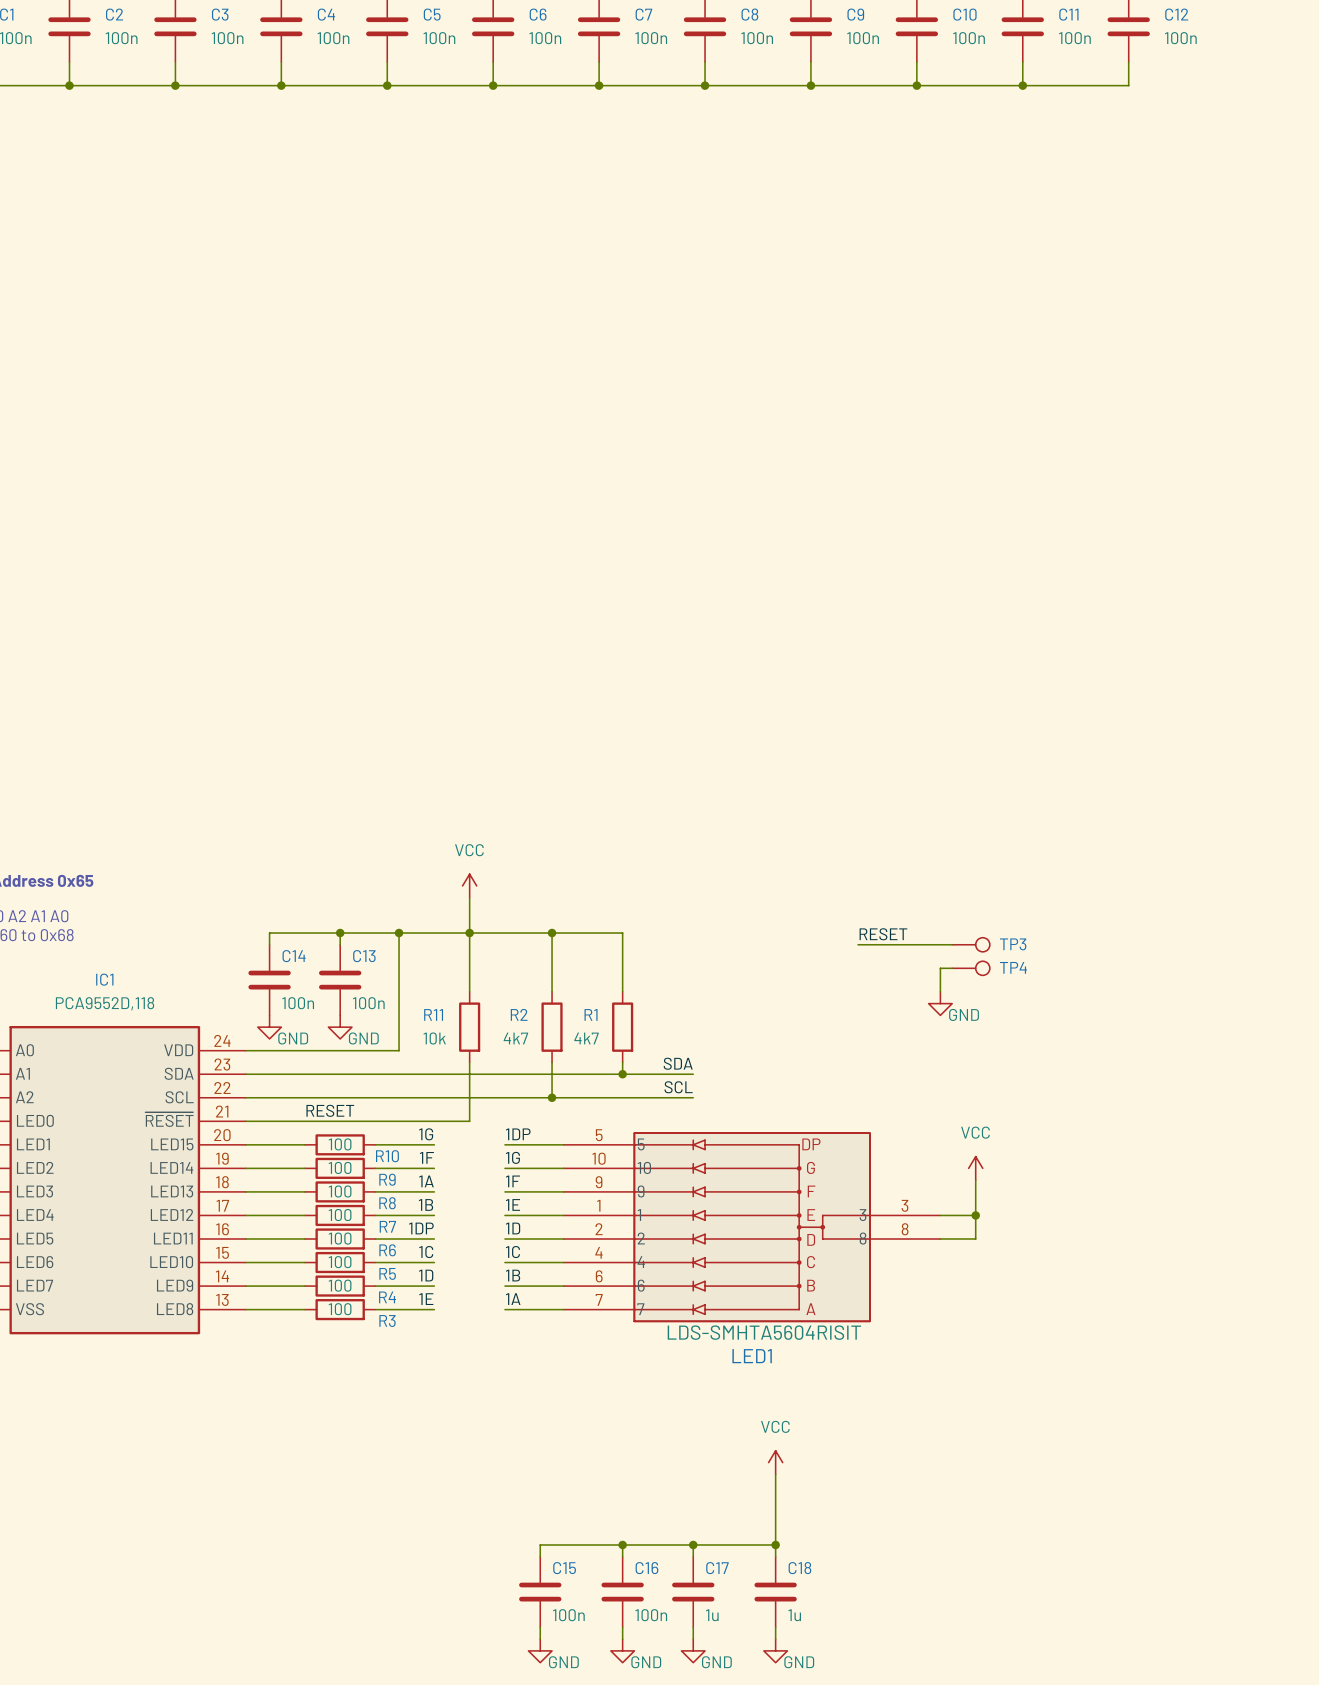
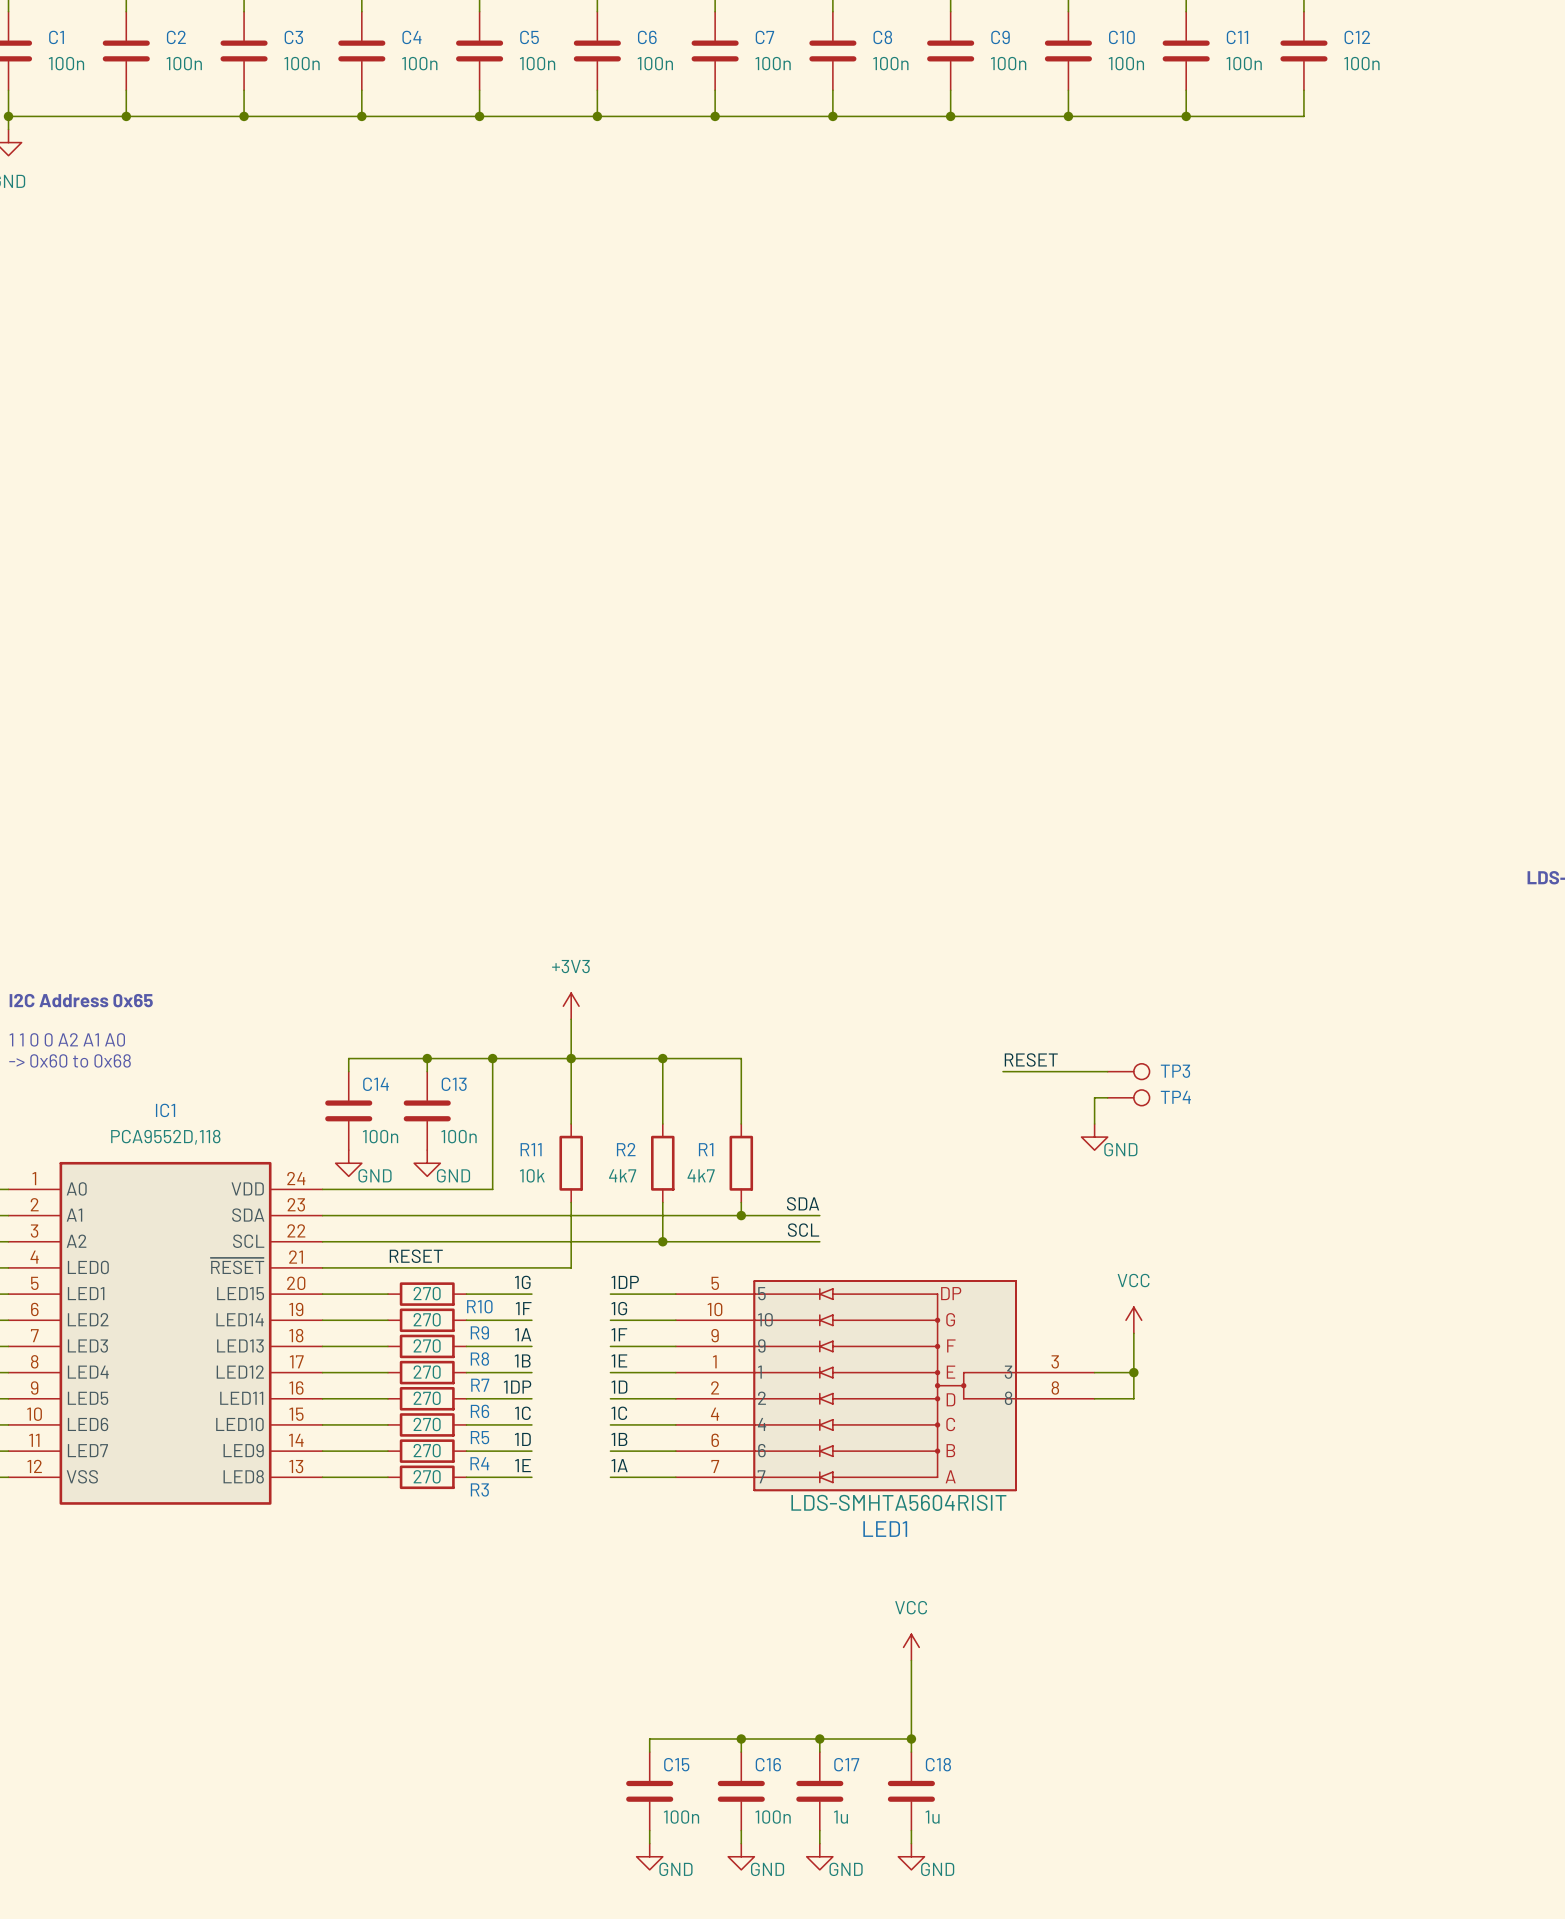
power symbol: VCC (469, 885) -> +3V3 (571, 1006)
R10 value: 100 (340, 1144) -> 270 (427, 1293)
R9 value: 100 (340, 1167) -> 270 (427, 1319)
R8 value: 100 (340, 1191) -> 270 (427, 1345)
R7 value: 100 (340, 1215) -> 270 (427, 1372)
R6 value: 100 (340, 1238) -> 270 (427, 1398)
R5 value: 100 (340, 1262) -> 270 (427, 1424)
R4 value: 100 (340, 1285) -> 270 (427, 1450)
R3 value: 100 (340, 1309) -> 270 (427, 1476)

